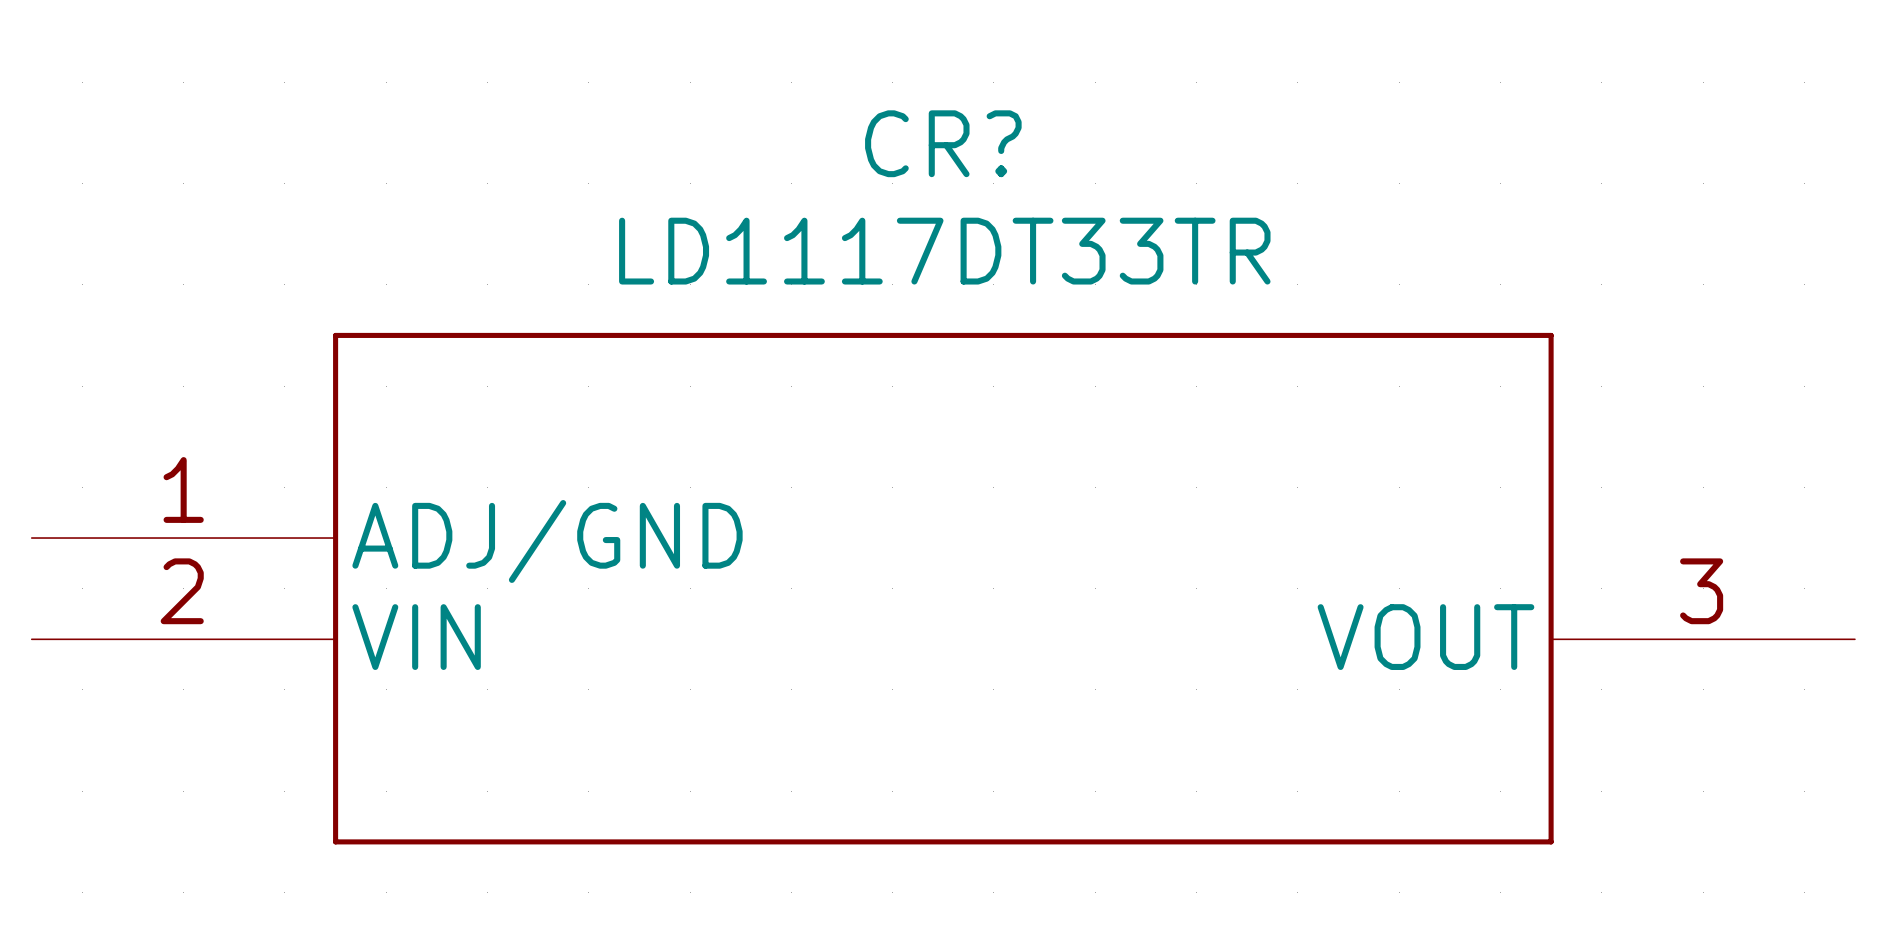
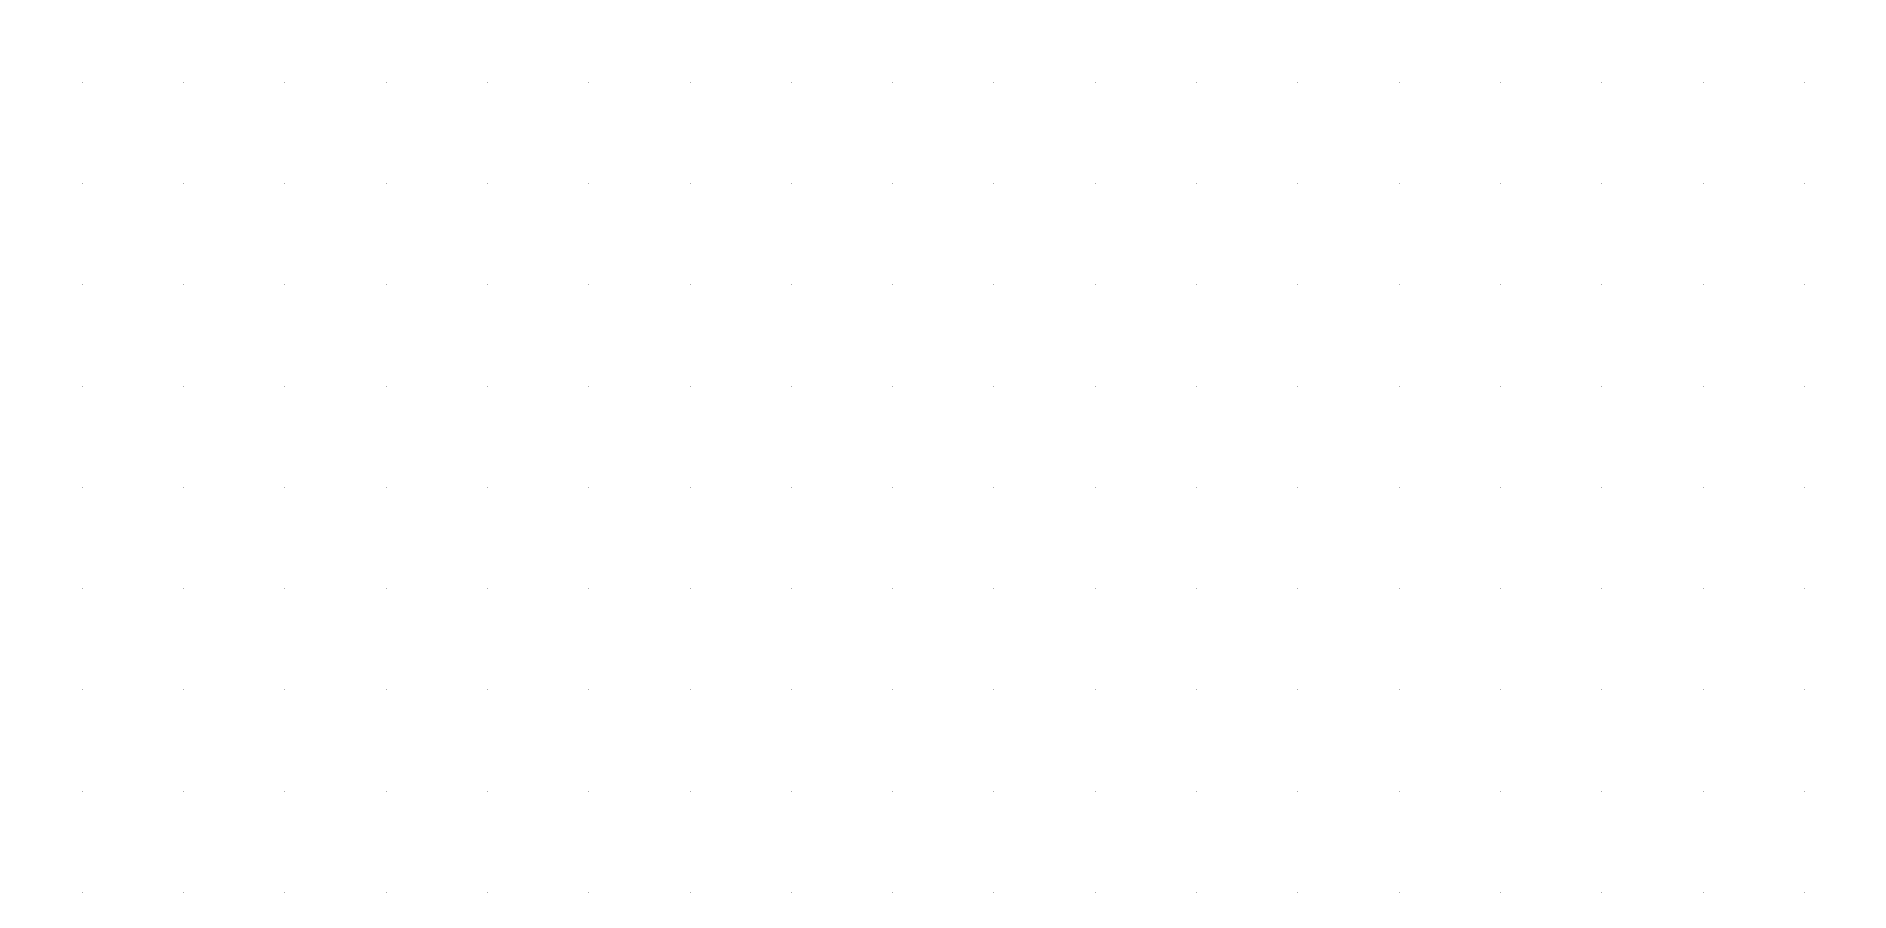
CR?: LD1117DT33TR (943, 588) -> none

